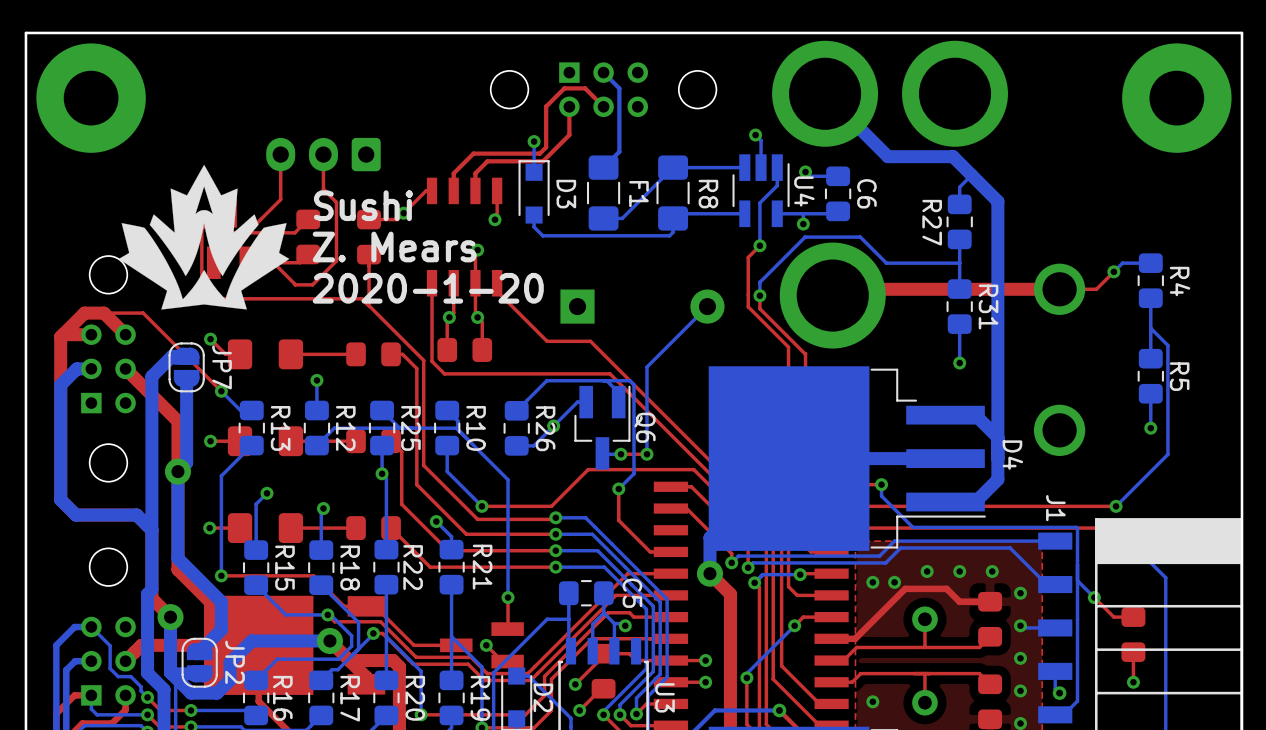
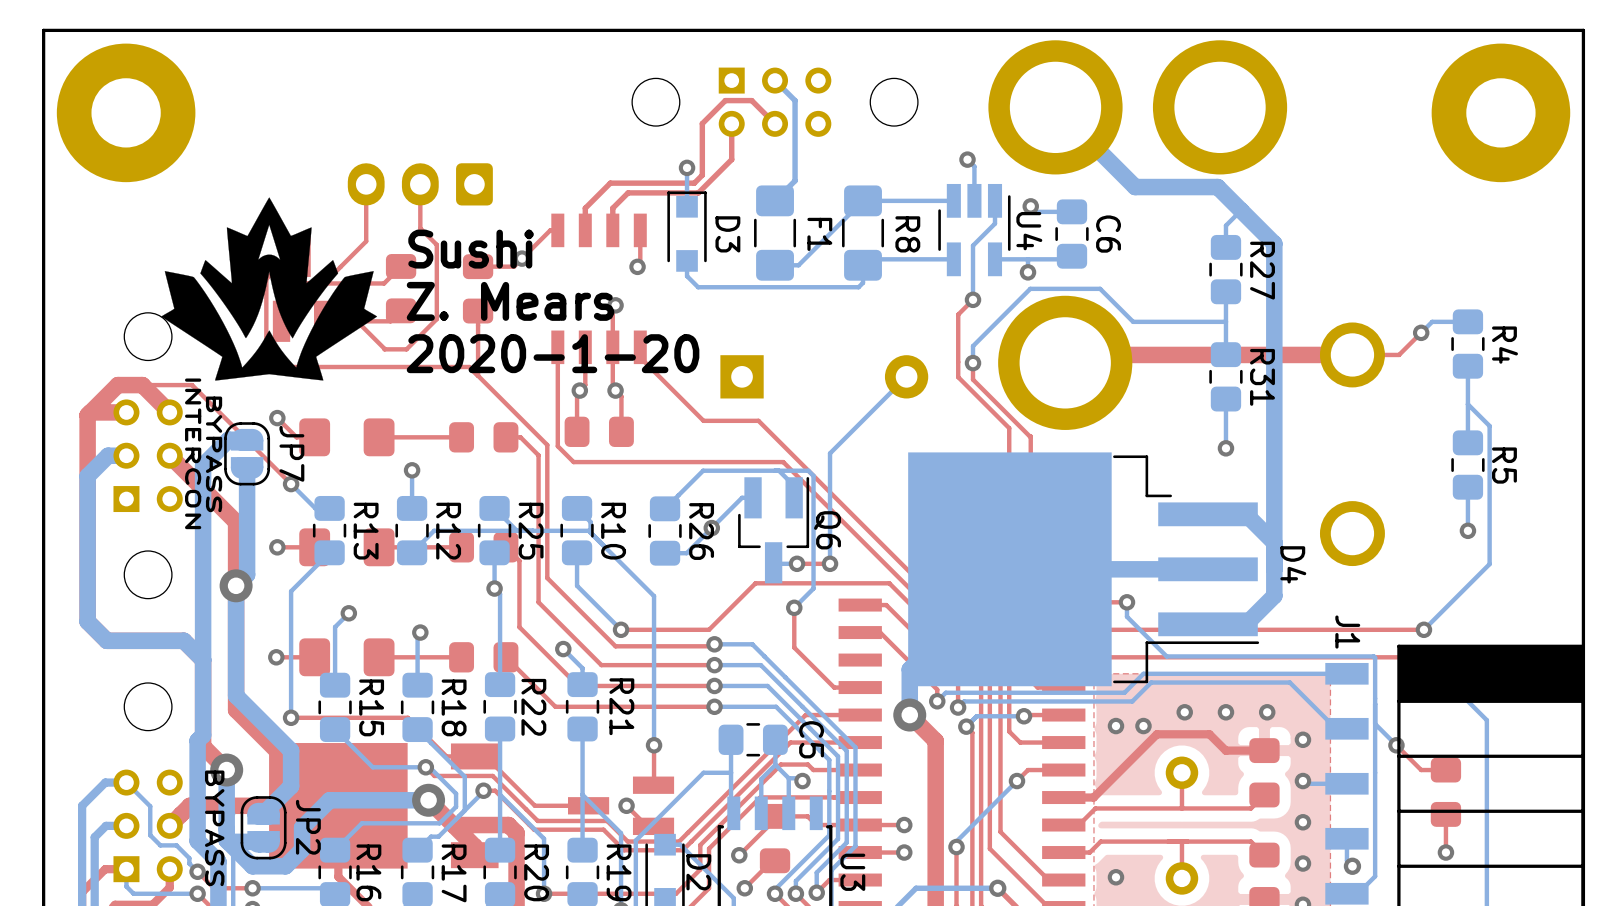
R27 name position: R27 (932, 222) -> R27 (1262, 270)
text: none -> INTERCON (193, 453)
text: none -> BYPASS (214, 454)
text: none -> BYPASS (214, 828)

